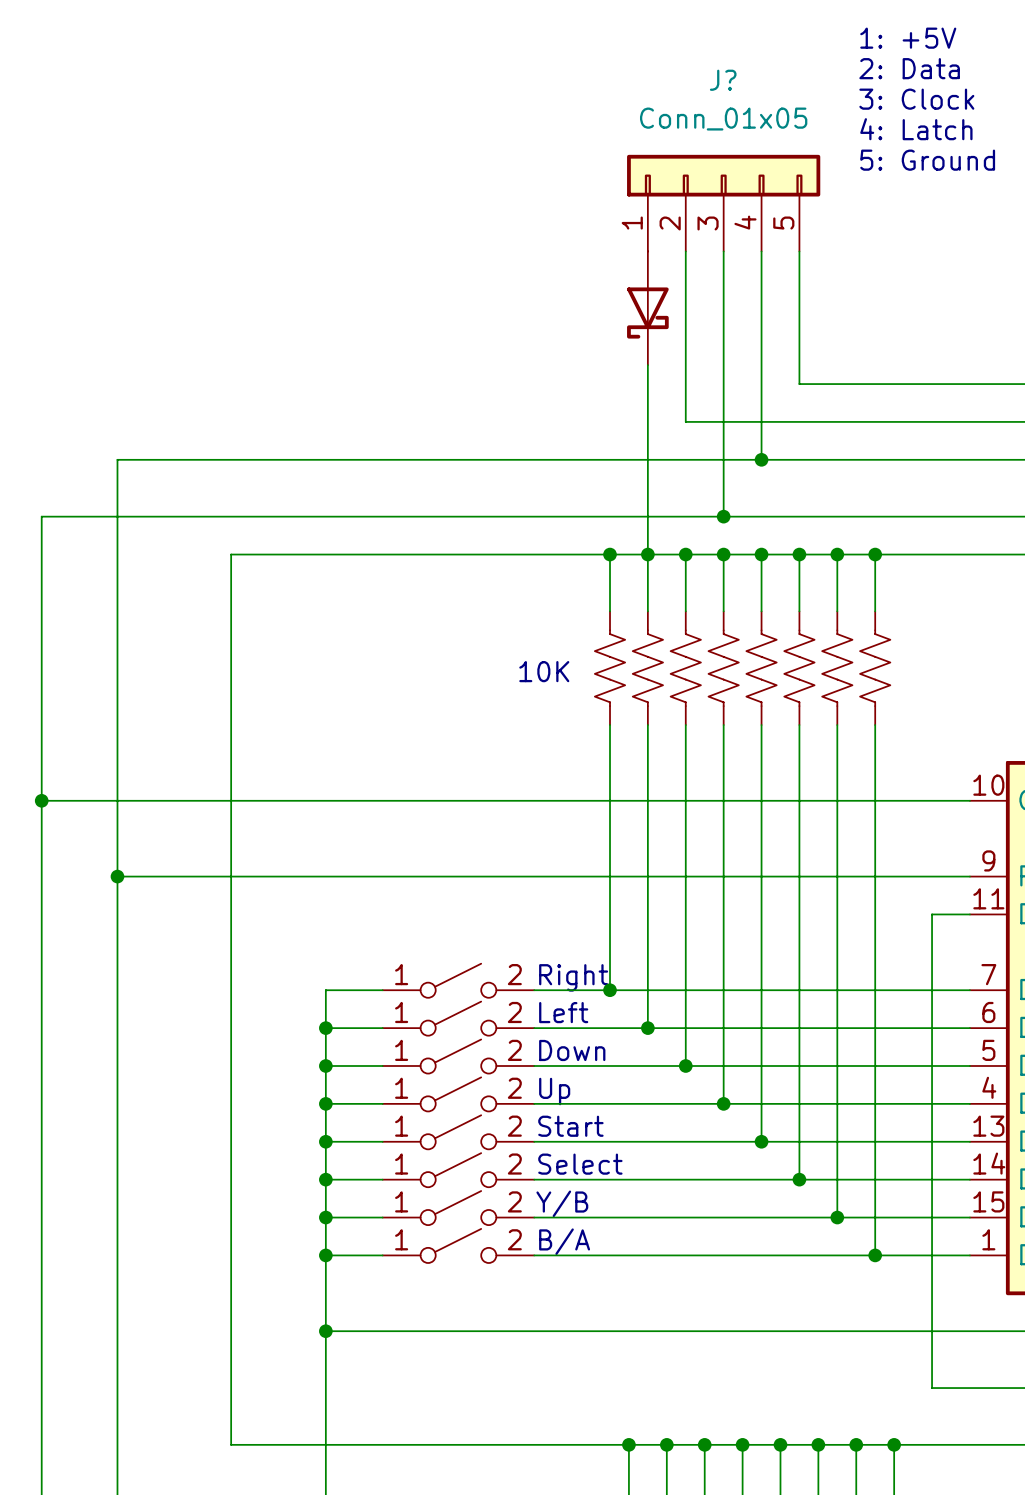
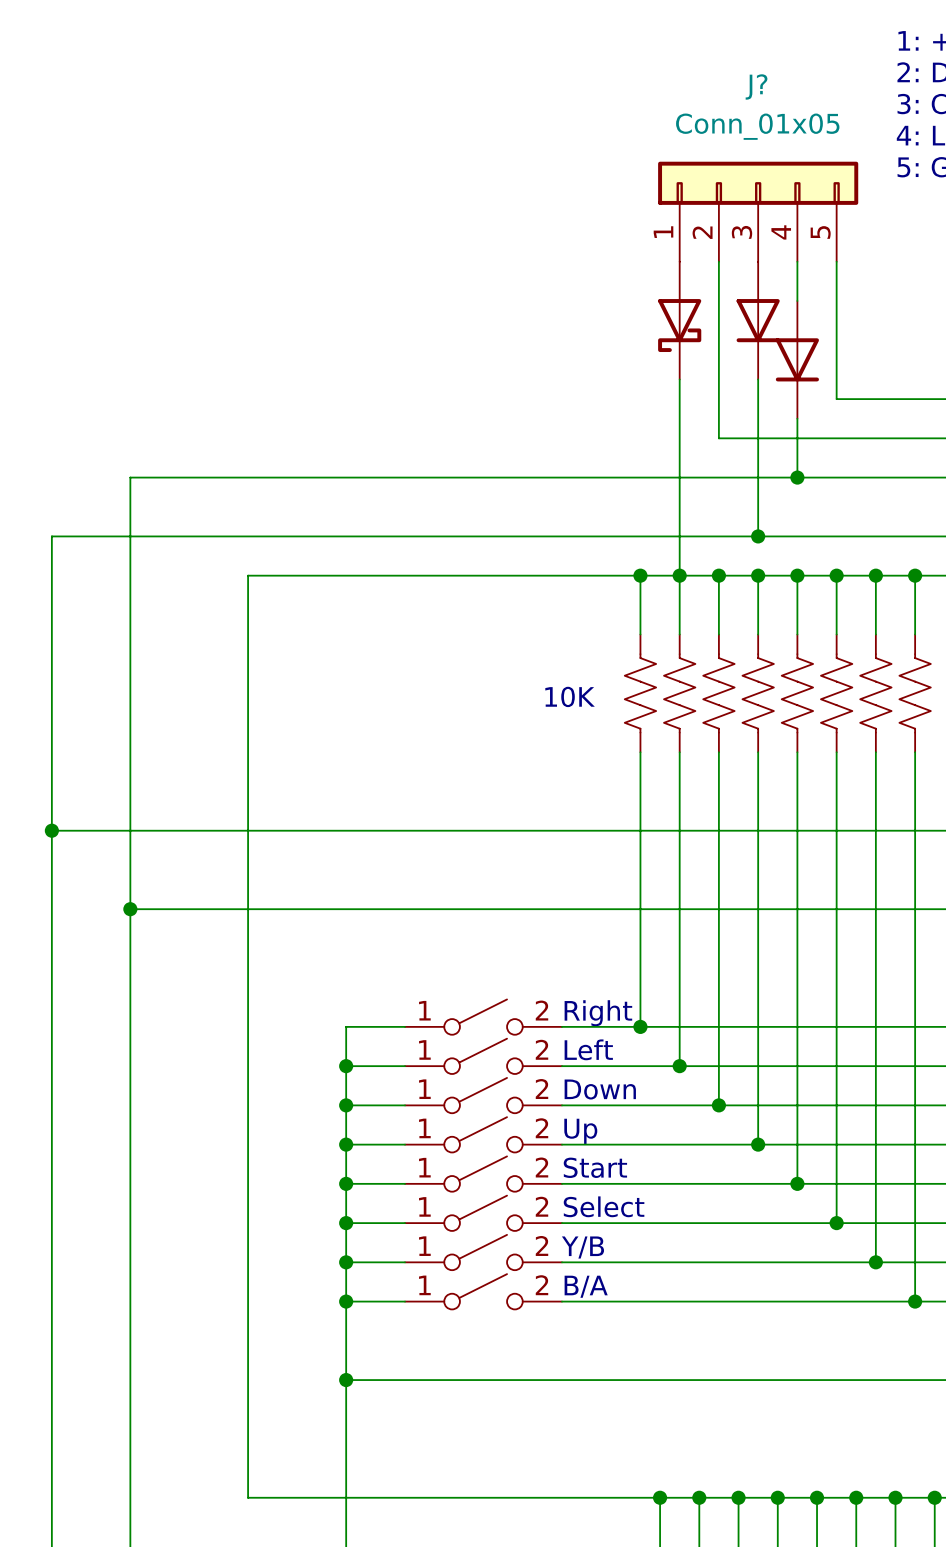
part: none -> (758, 320)
part: none -> (797, 359)

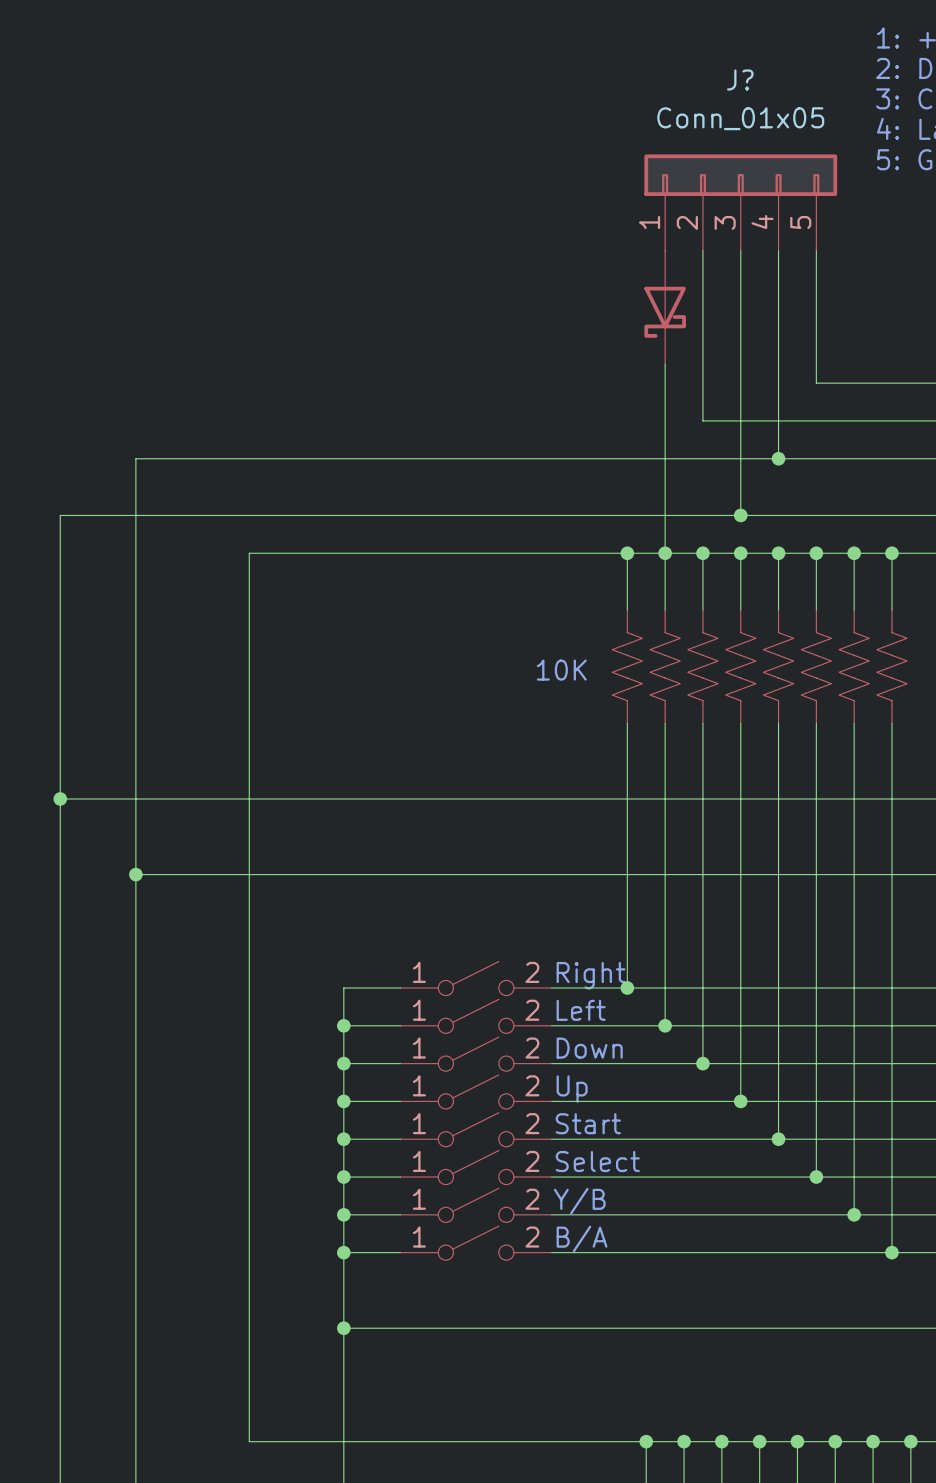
part: (758, 320) -> none
part: (797, 359) -> none

